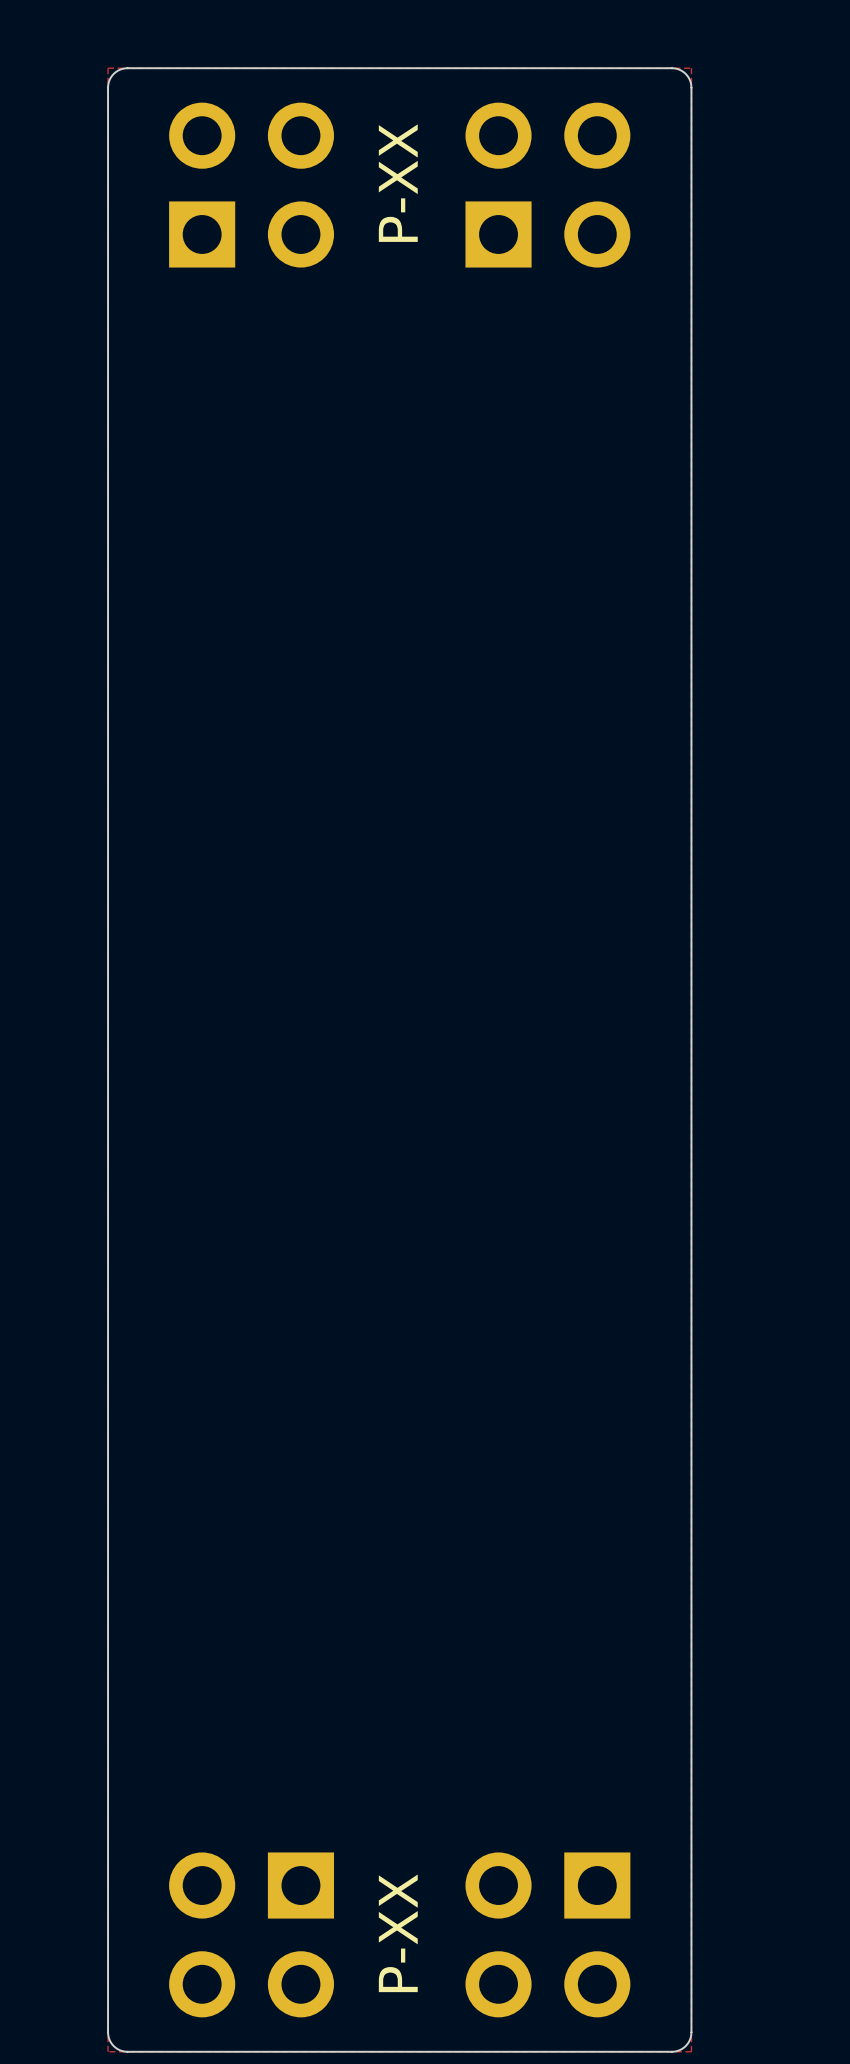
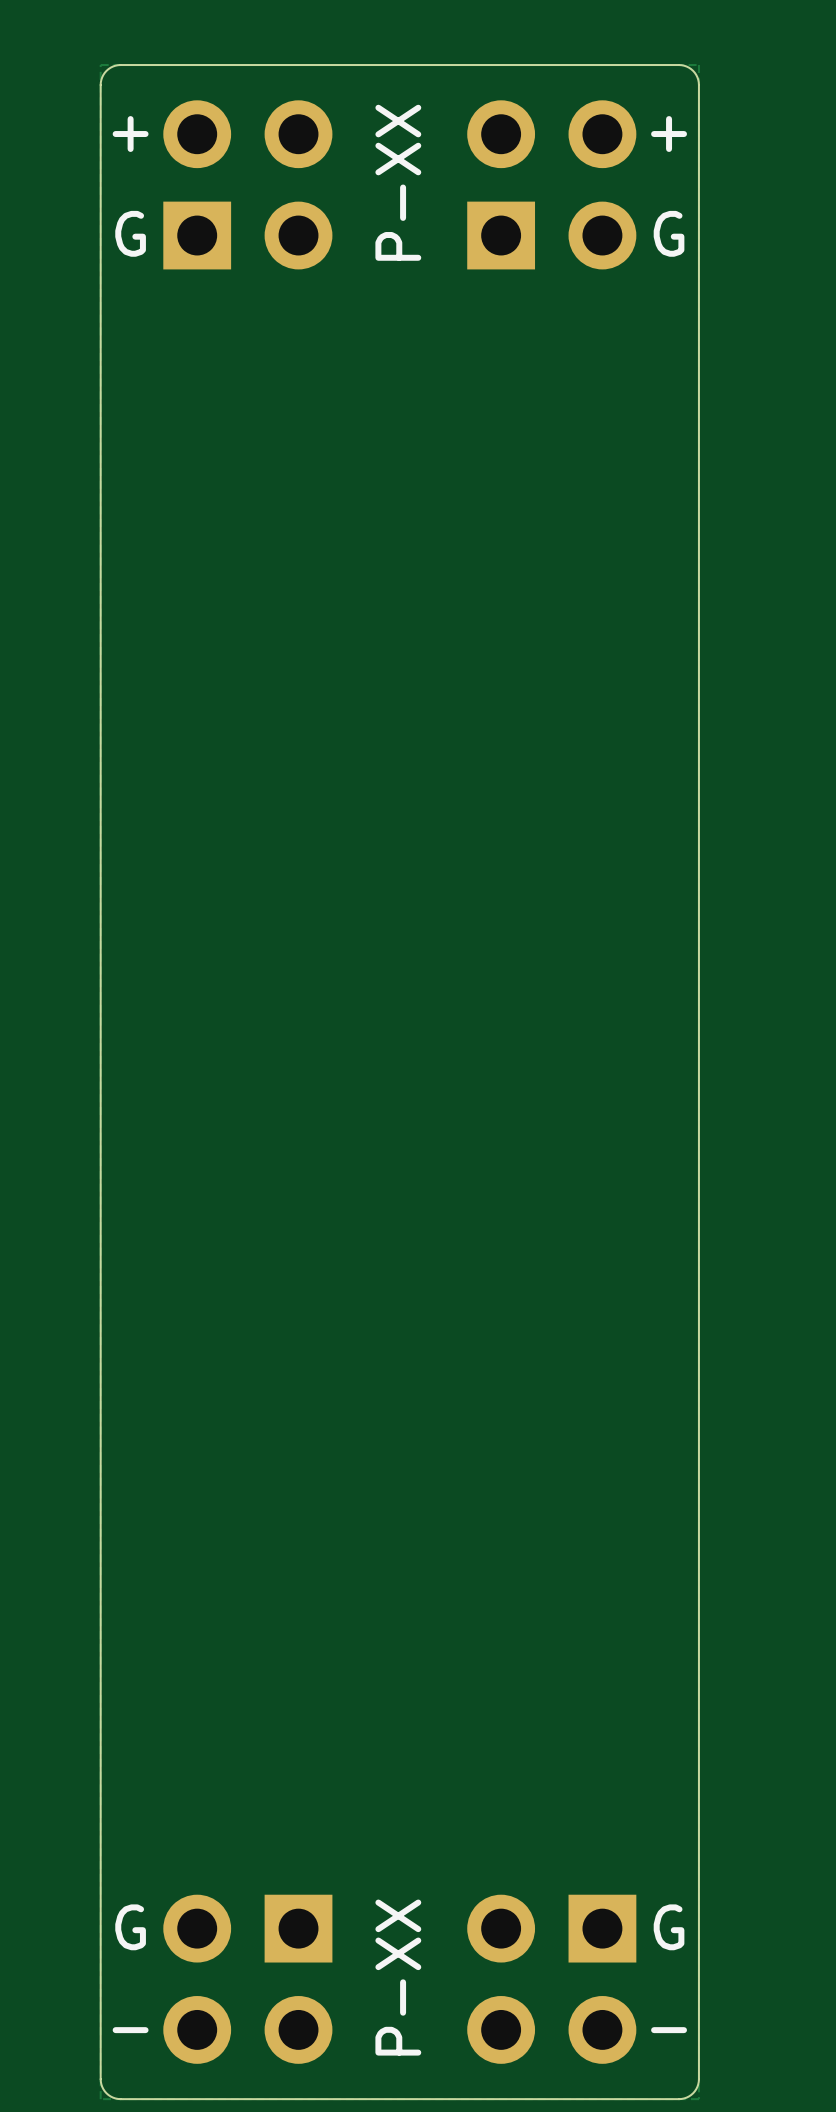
line: none -> (130, 119) (130, 148)
line: none -> (669, 119) (669, 148)
line: none -> (115, 134) (145, 134)
line: none -> (654, 134) (684, 134)
text: none -> G (130, 233)
text: none -> G (669, 233)
text: none -> G (130, 1927)
text: none -> G (669, 1927)
line: none -> (115, 2030) (145, 2030)
line: none -> (654, 2030) (684, 2030)

